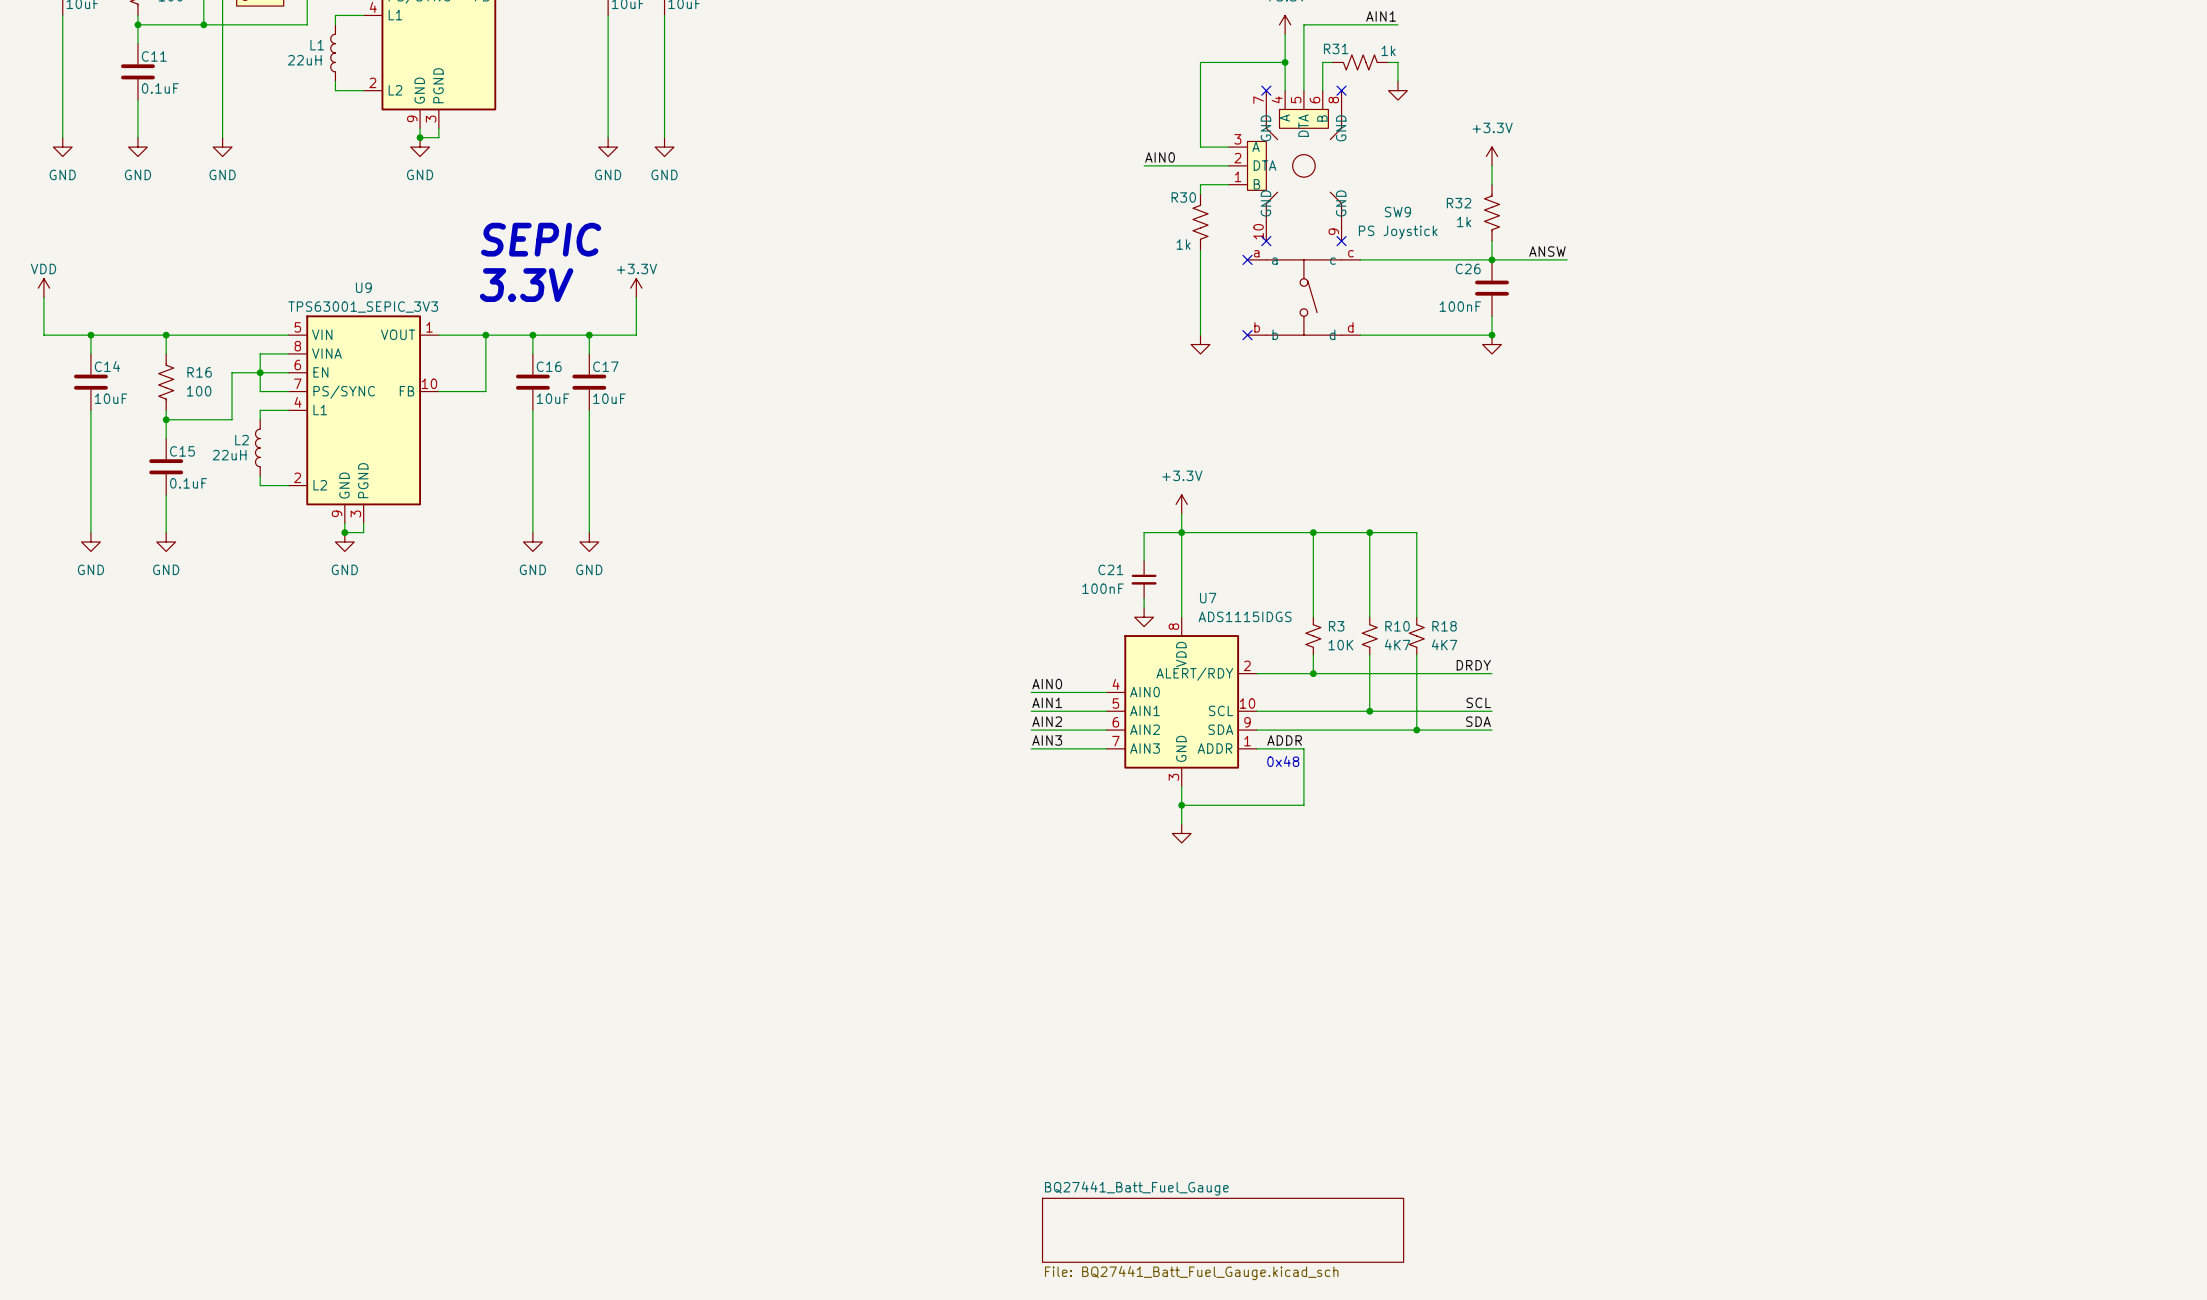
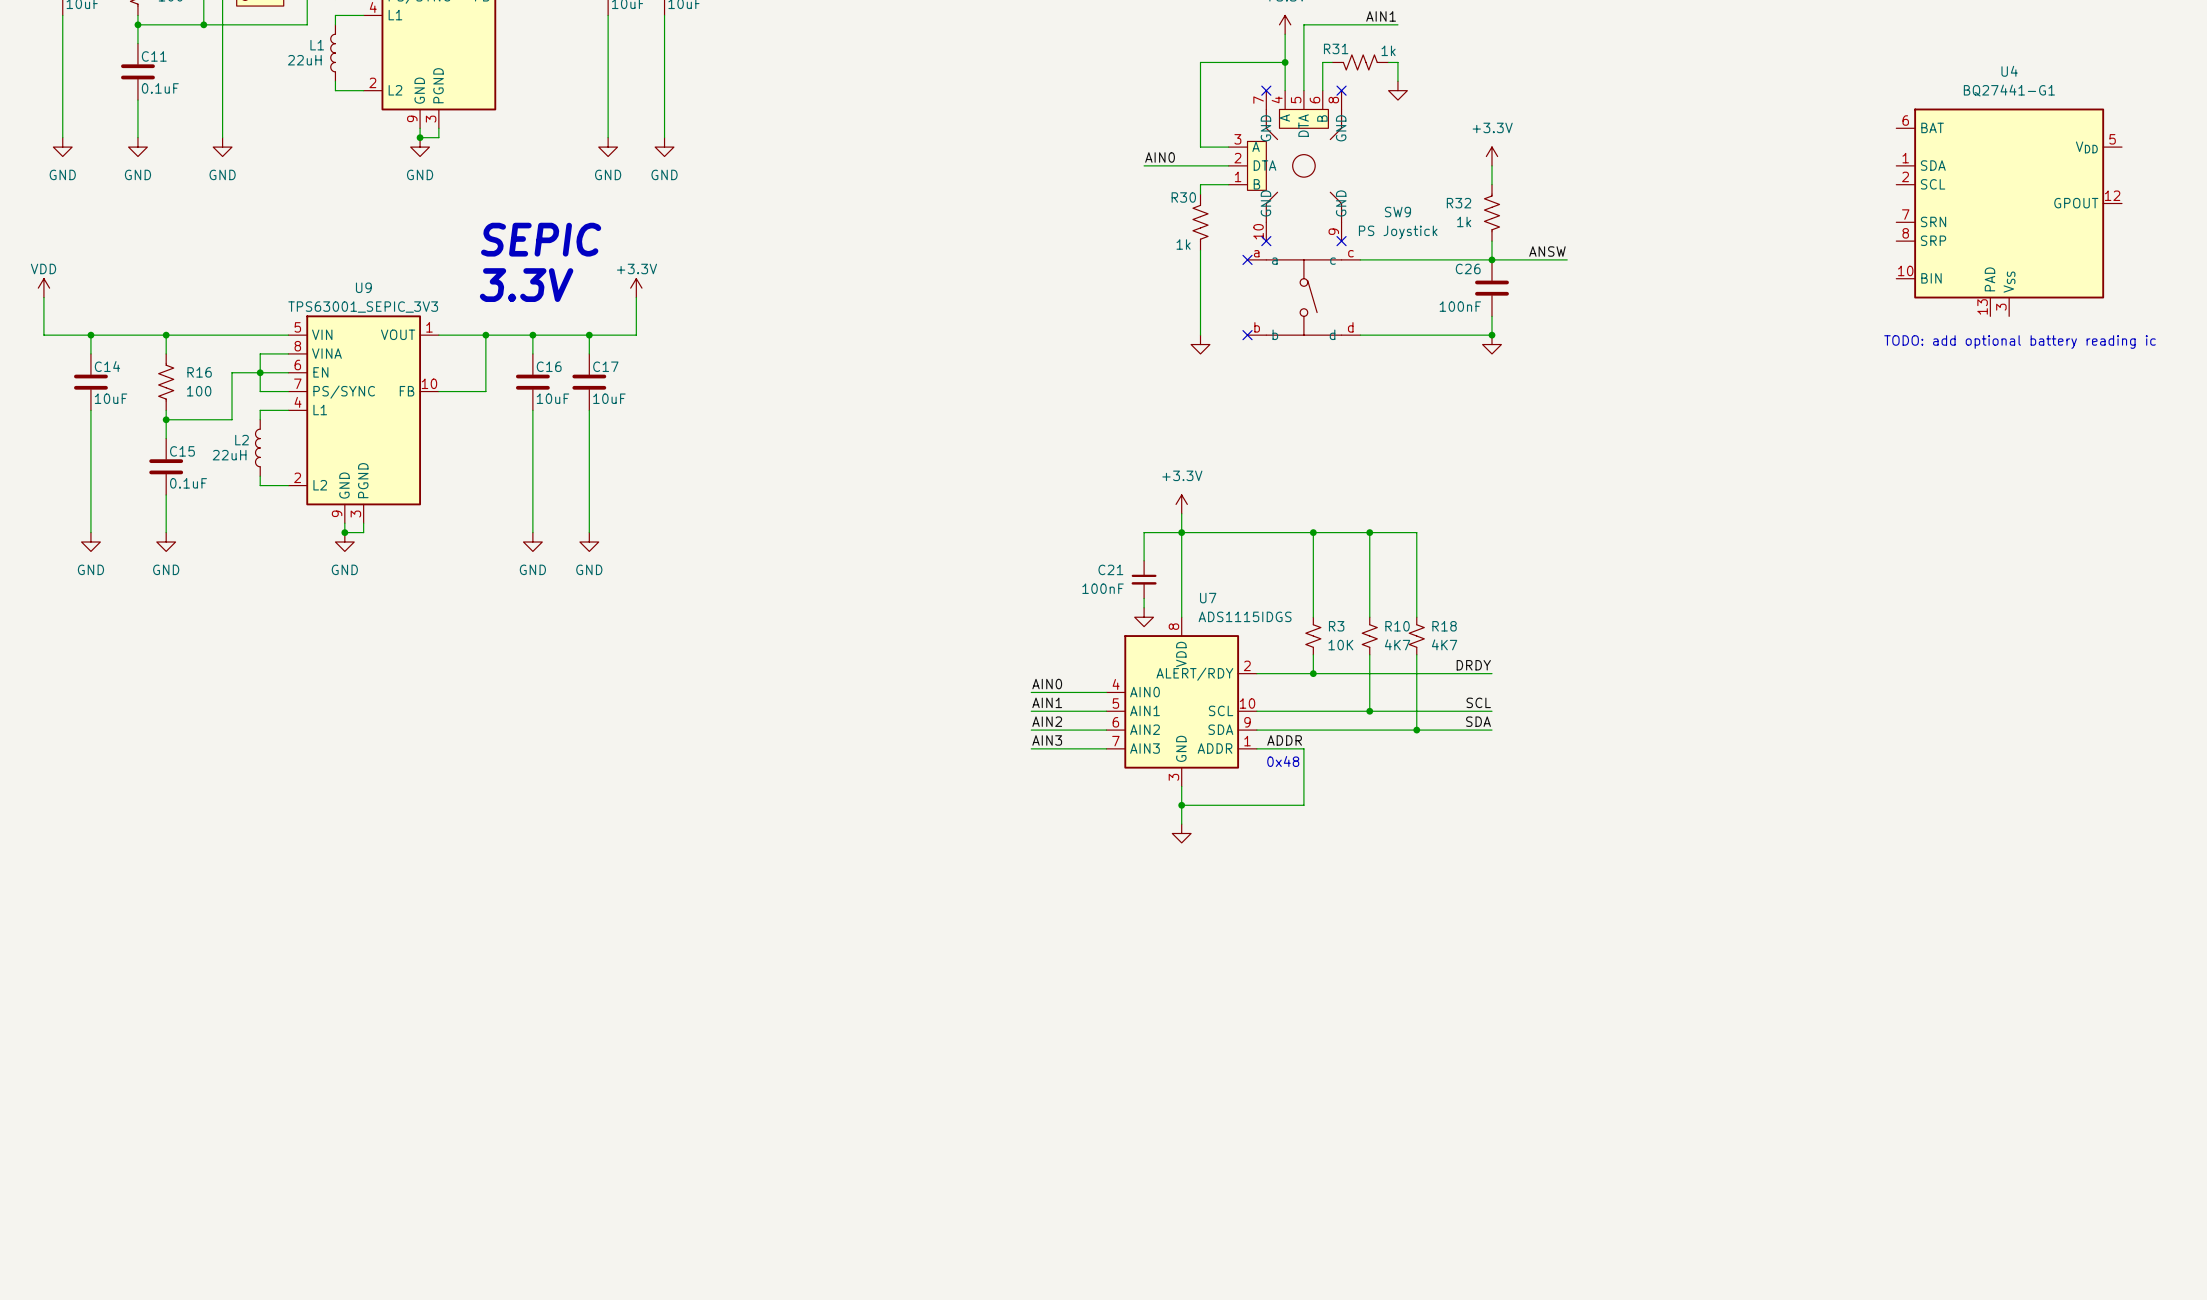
U4: none -> BQ27441-G1 (2009, 212)
text: none -> TODO: add optional battery reading ic (2019, 342)
sheet BQ27441_Batt_Fuel_Gauge: File: BQ27441_Batt_Fuel_Gauge.kicad_sch (1223, 1230) -> none

